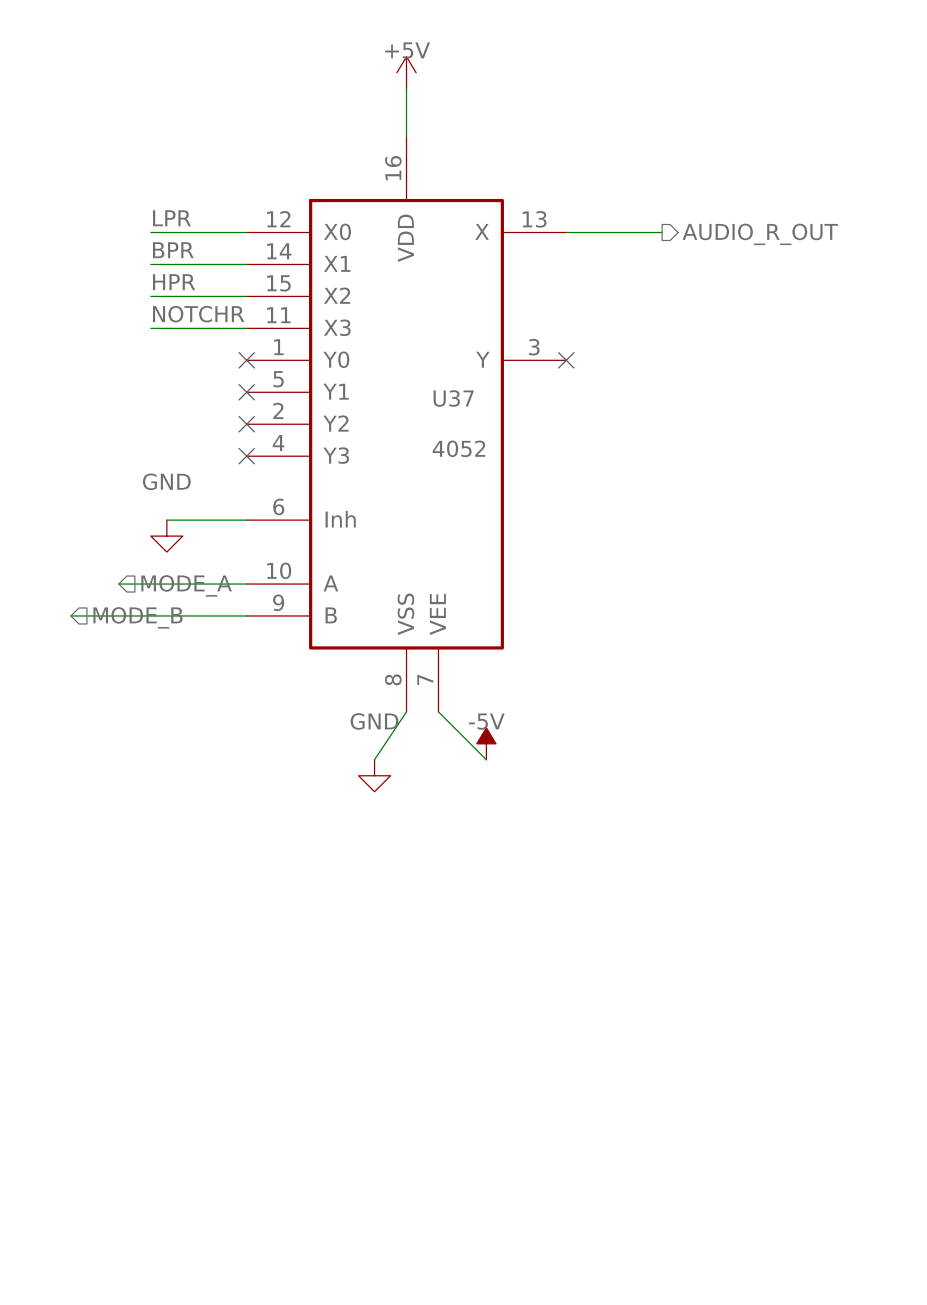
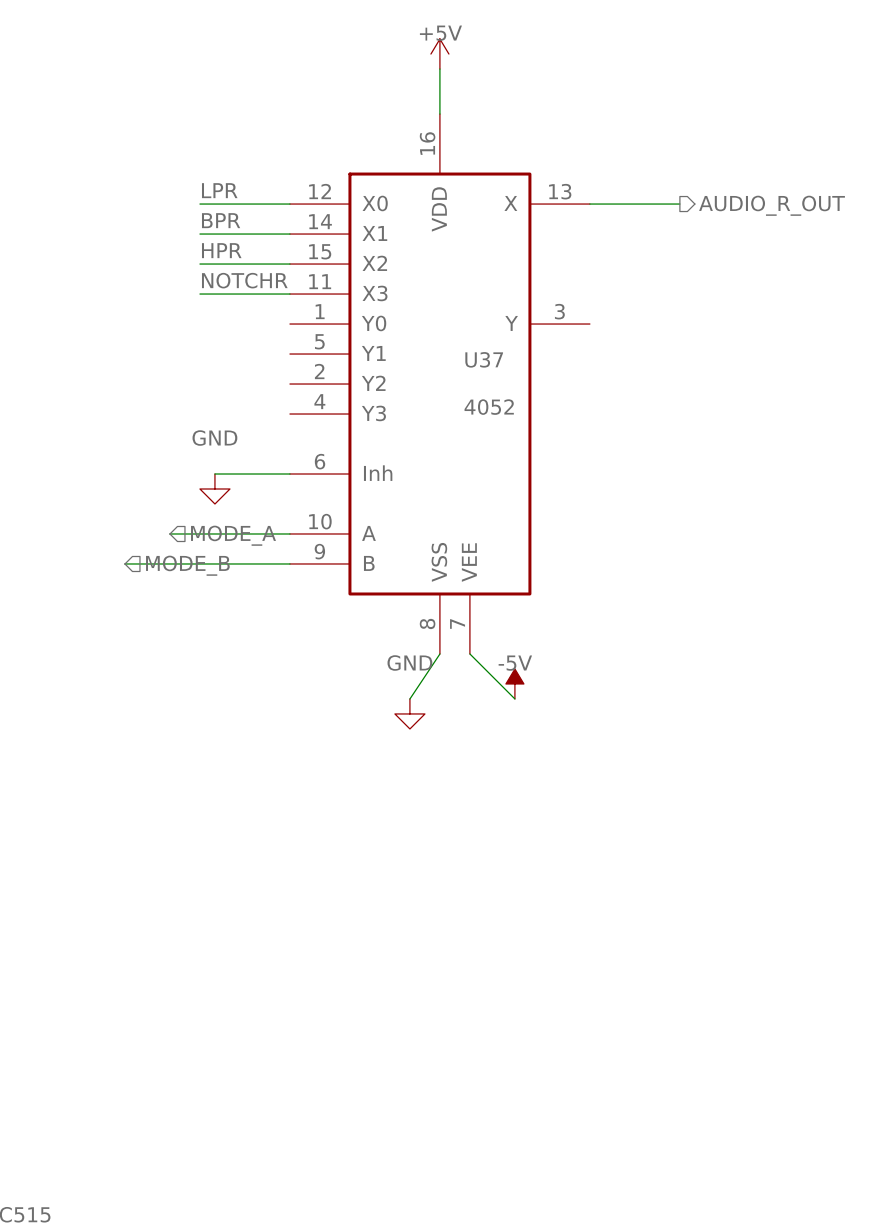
no-connect mark: (246, 360) -> none
no-connect mark: (566, 360) -> none
no-connect mark: (246, 392) -> none
no-connect mark: (246, 424) -> none
no-connect mark: (246, 456) -> none

